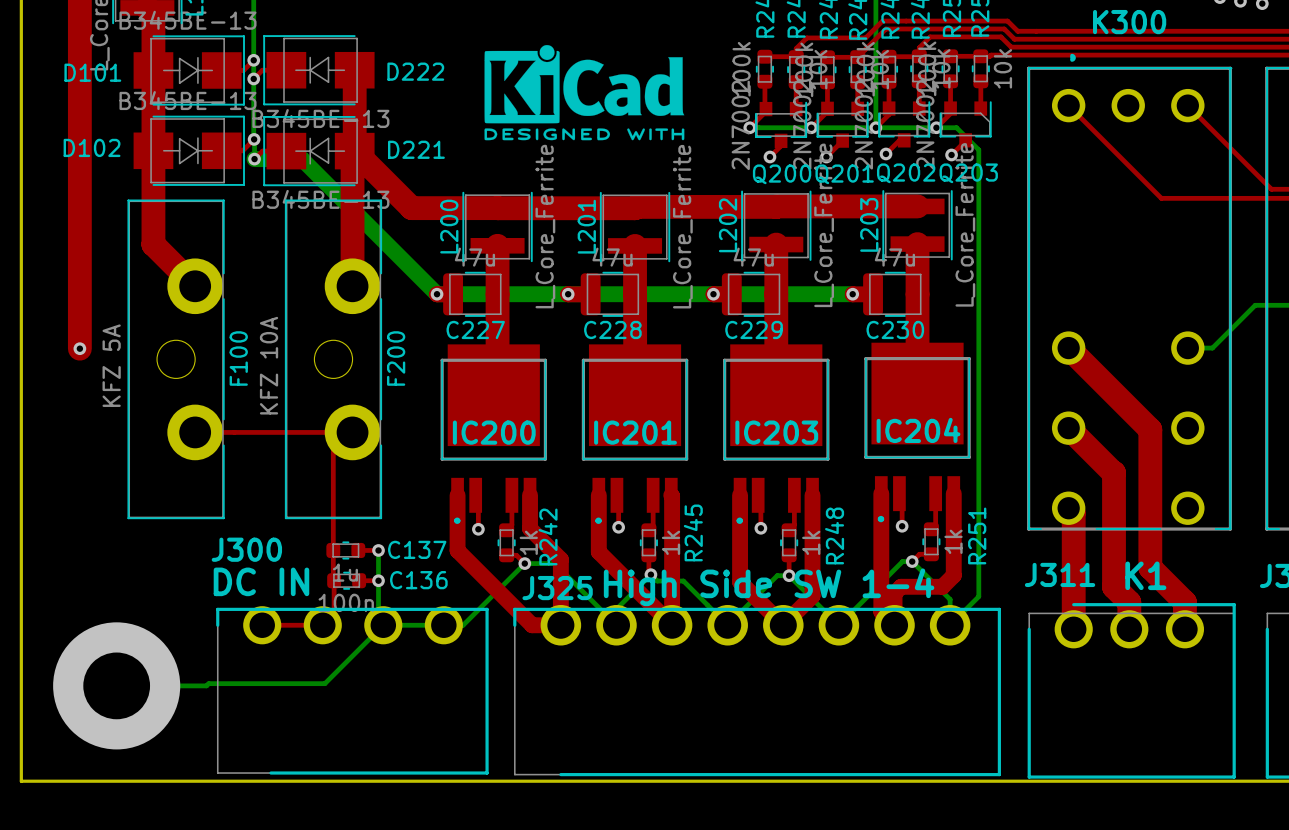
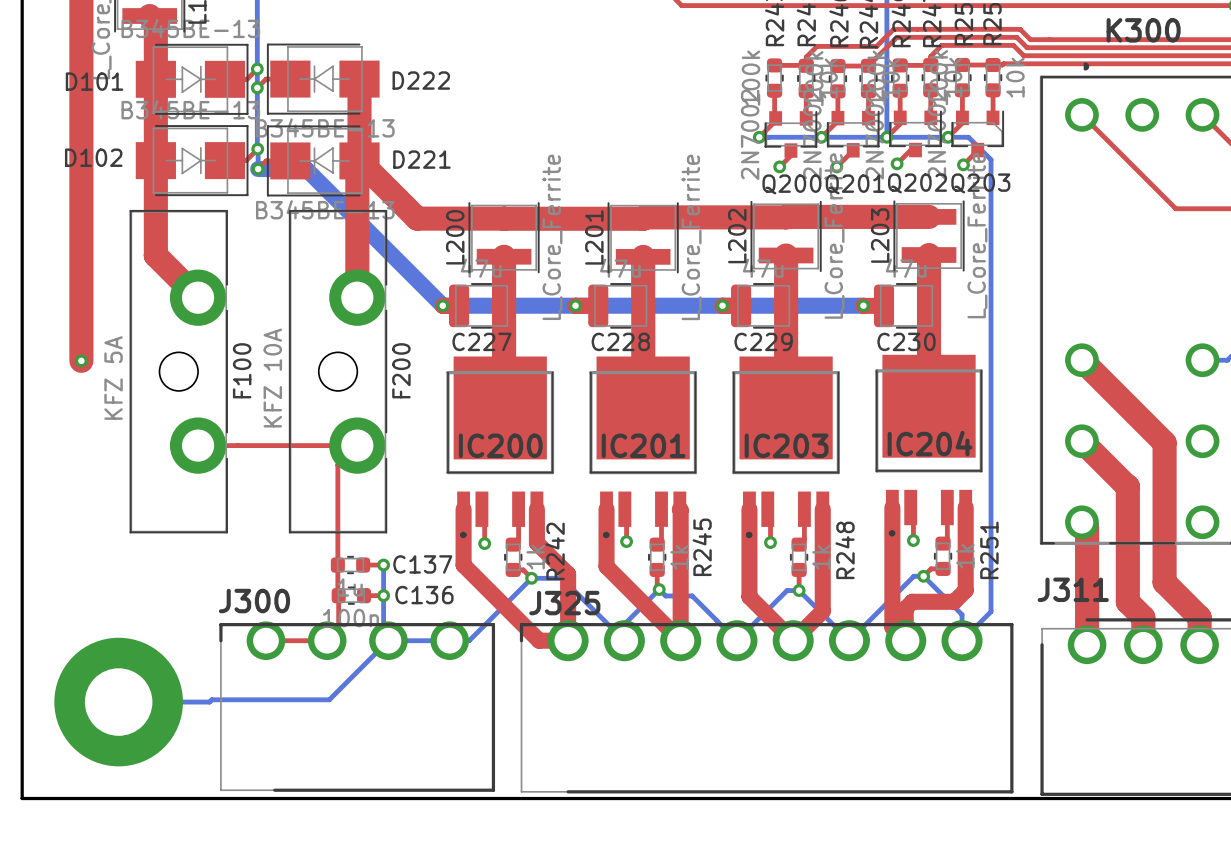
drawing: [484, 45, 685, 141] -> none
J300 name position: J300 (246, 549) -> J300 (254, 601)
text: K1 (1145, 575) -> none
text: DC IN (261, 581) -> none
text: High Side SW 1-4 (769, 587) -> none

